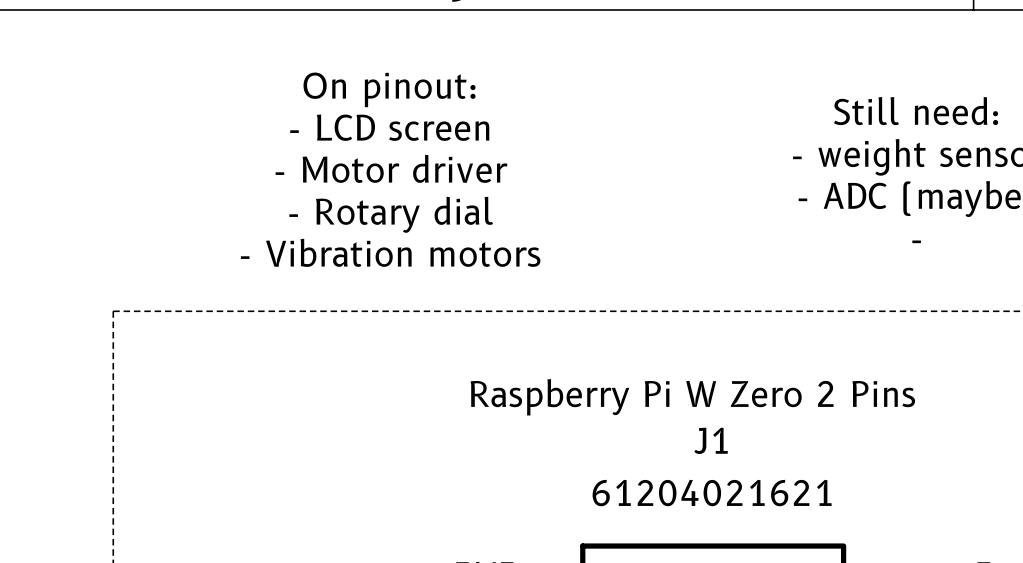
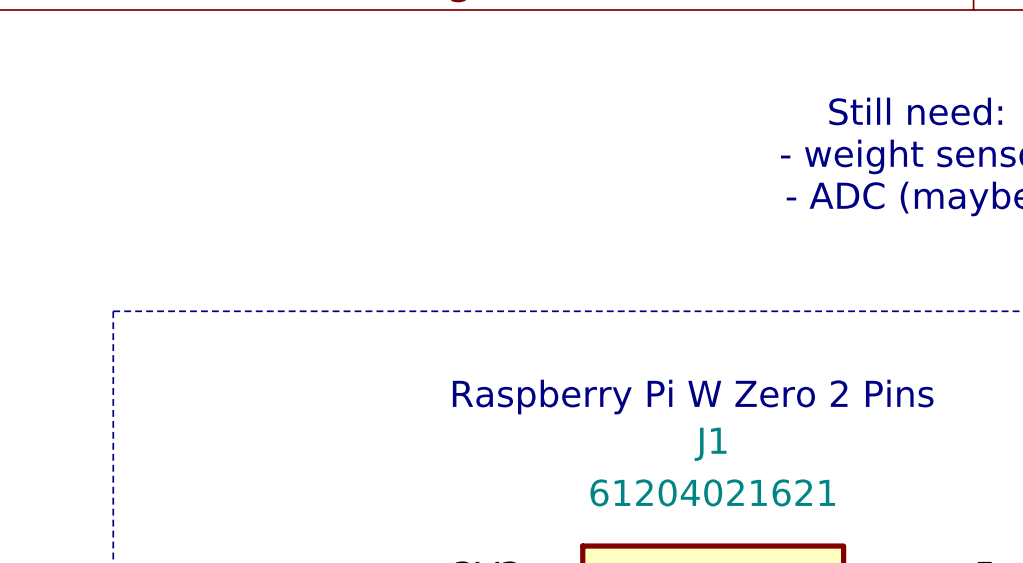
text: On pinout: (389, 89) -> none
text: - LCD screen (389, 127) -> none
text: - Motor driver (391, 168) -> none
text: - Rotary dial (391, 214) -> none
text: - (916, 241) -> none
text: - Vibration motors (390, 252) -> none

